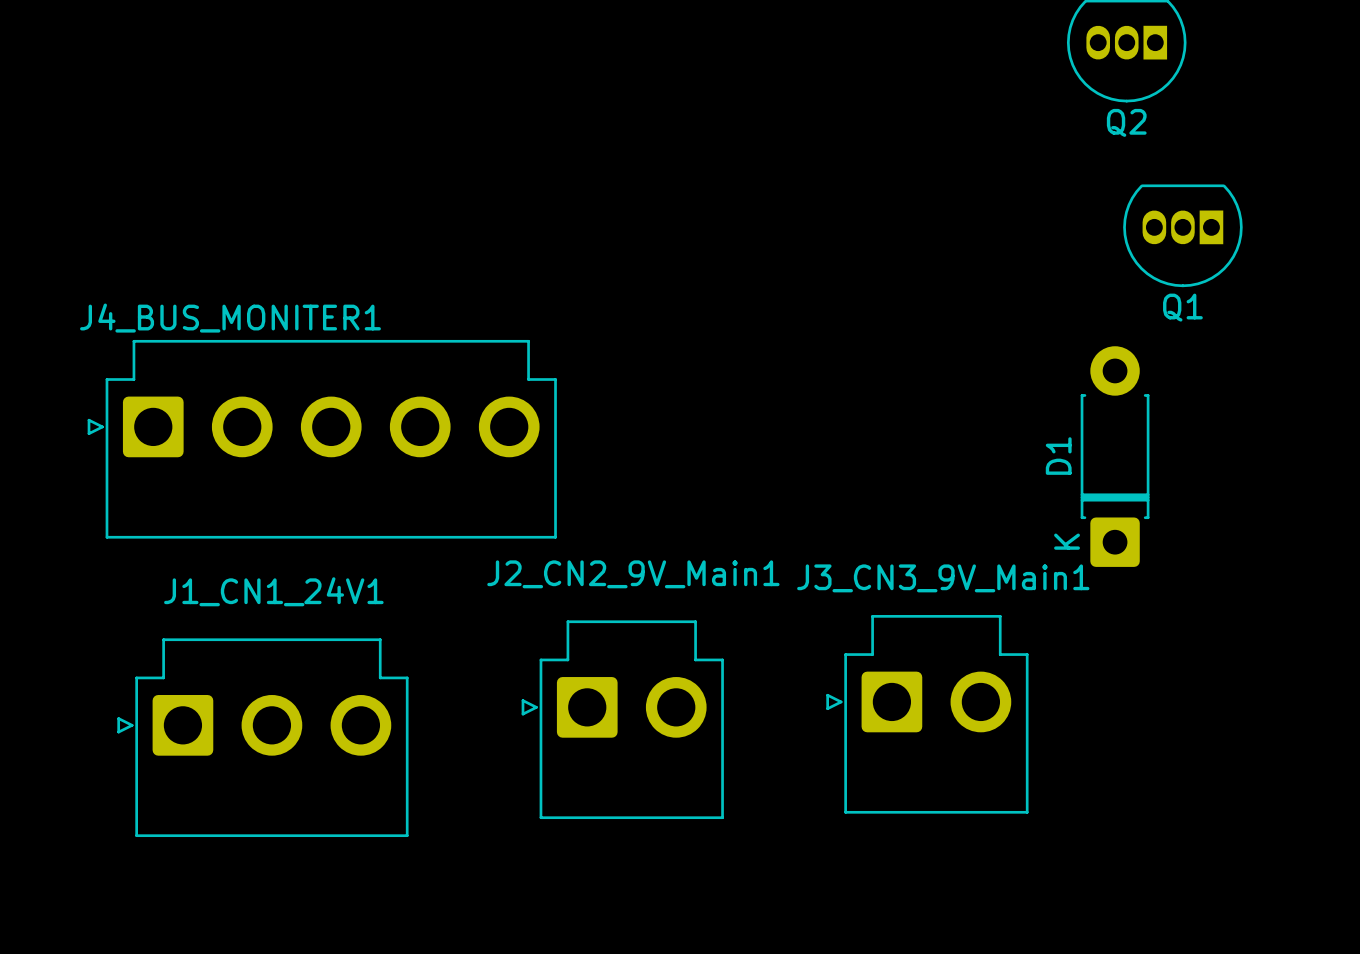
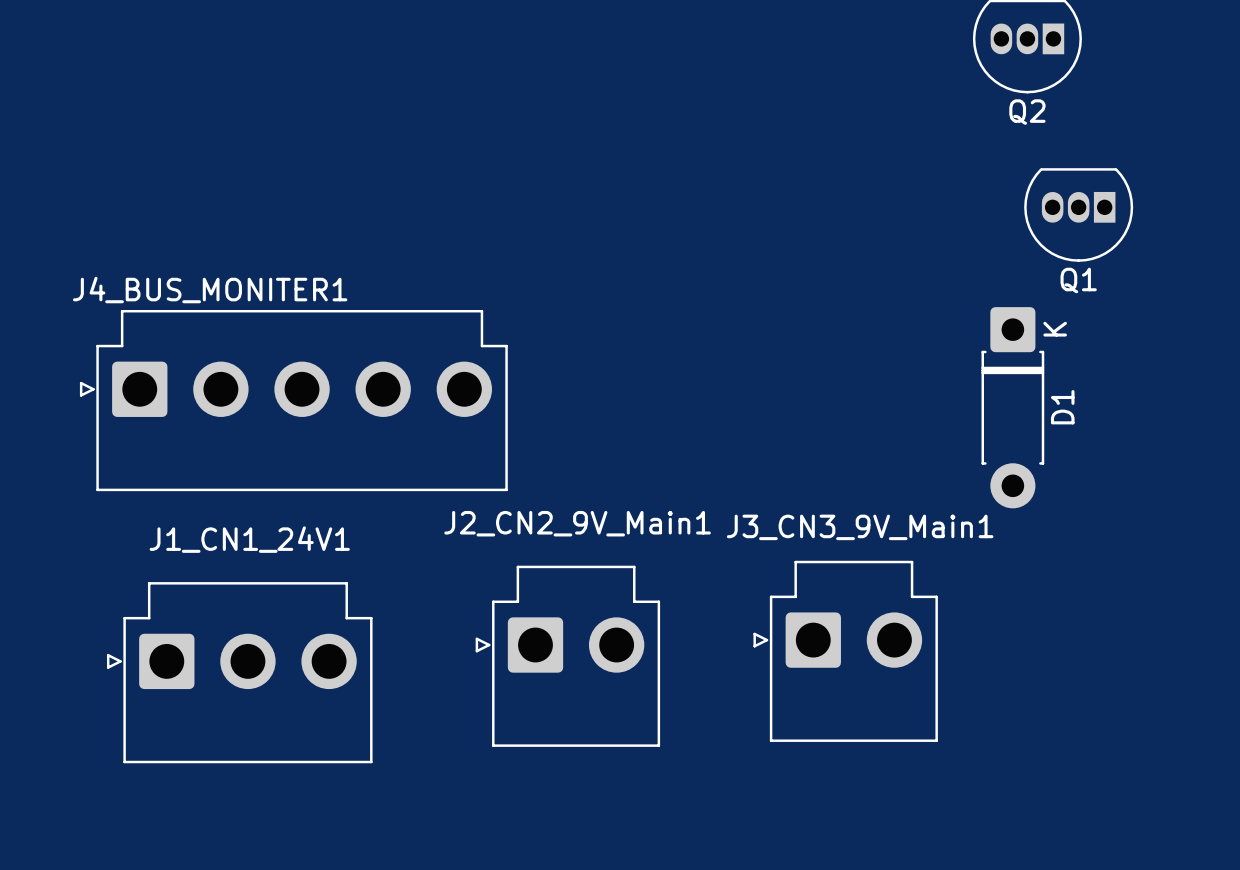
D1 rotation: 0° (1115, 456) -> 180° (1012, 407)

